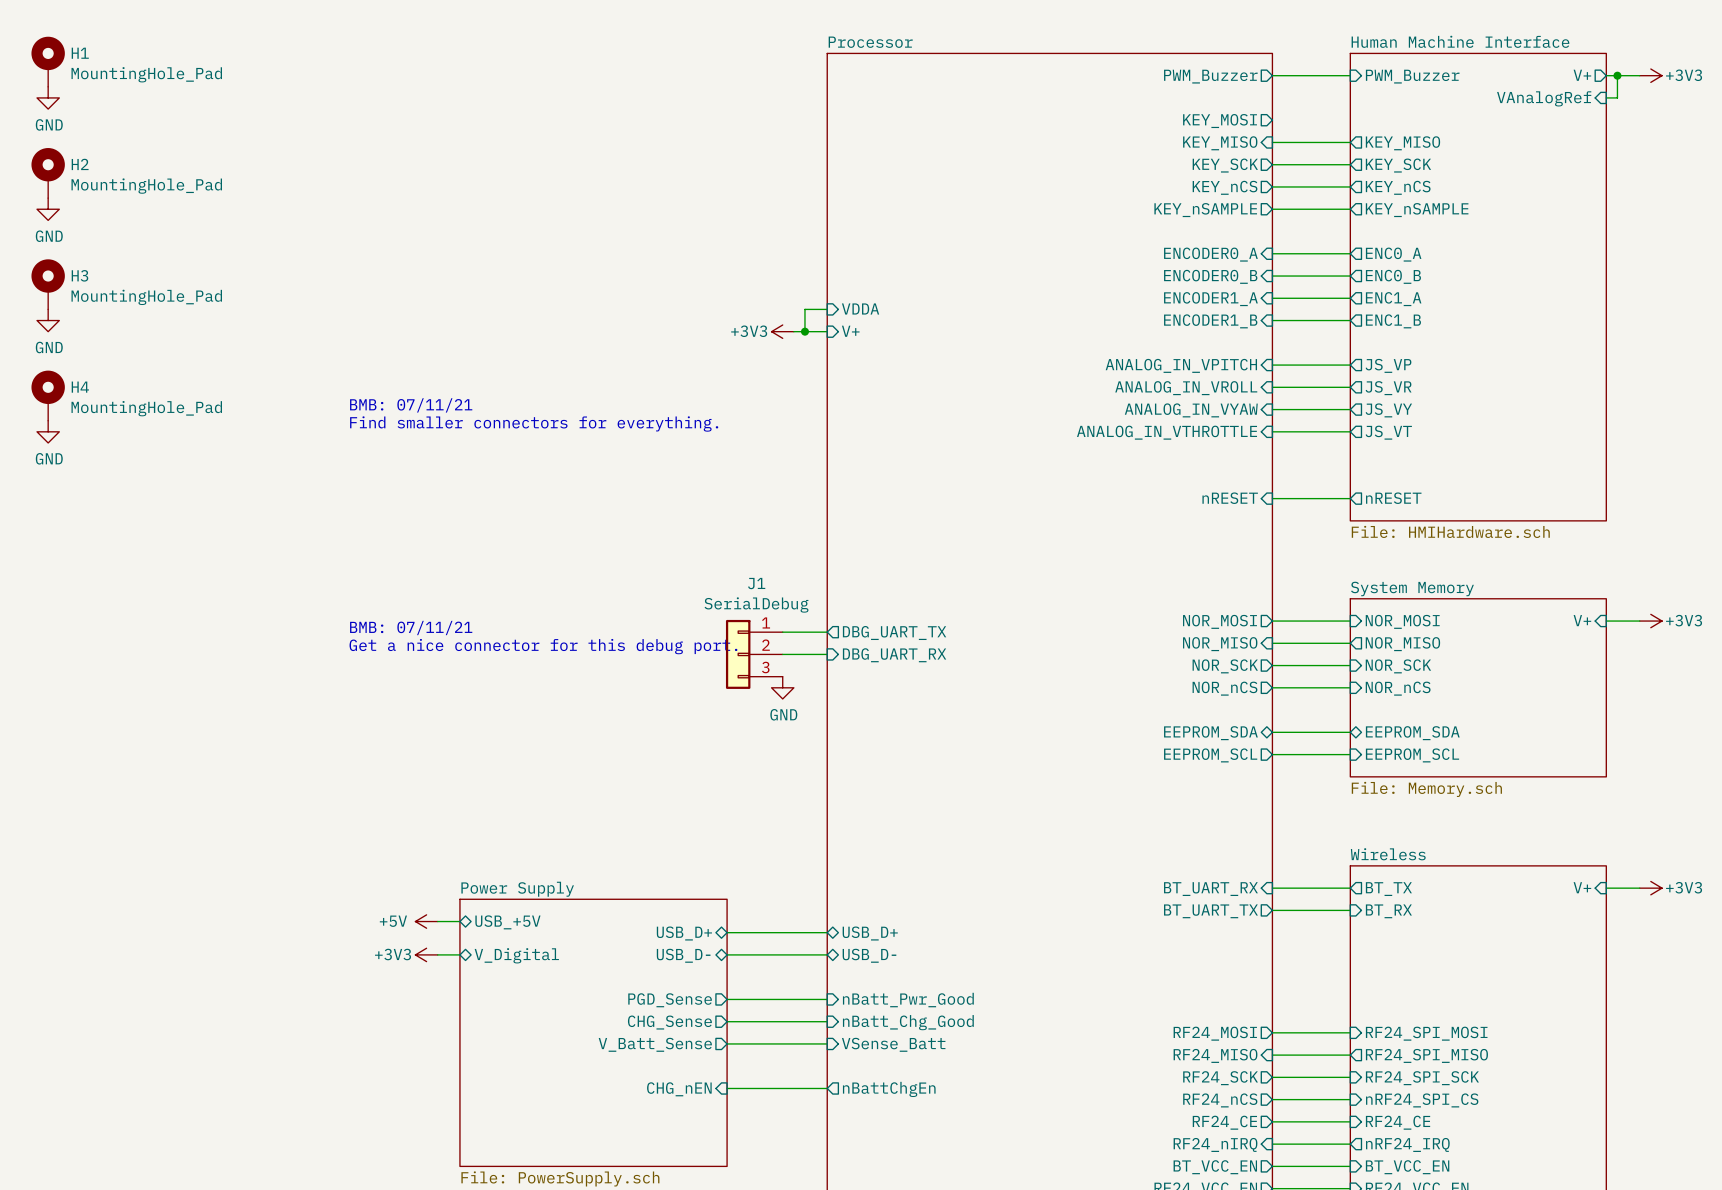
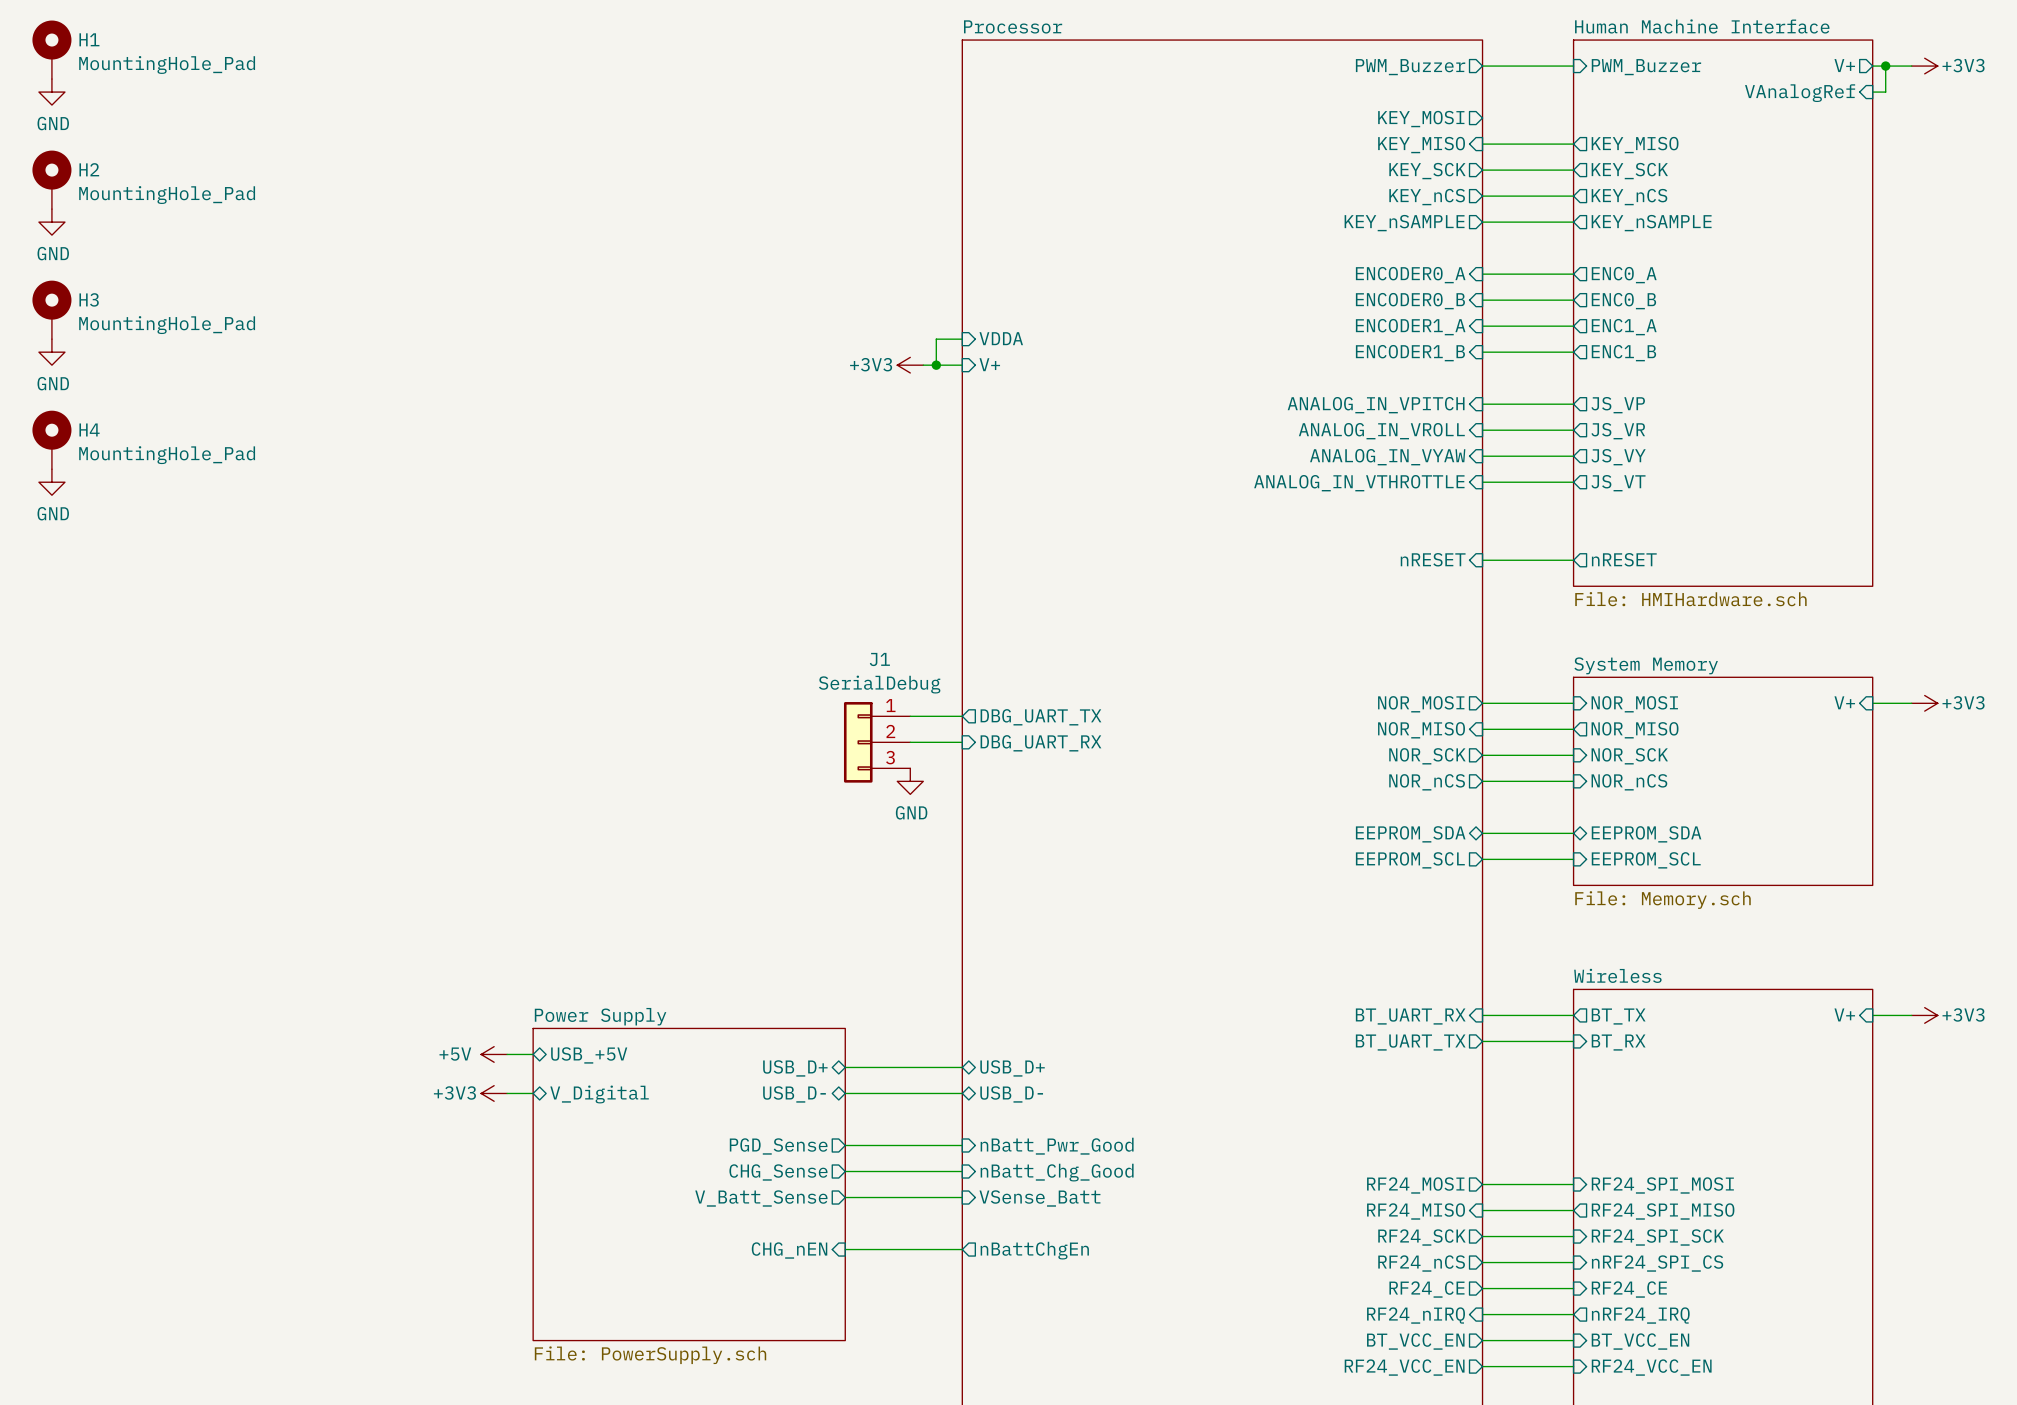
text: BMB: 07/11/21 (411, 405) -> none
text: Find smaller connectors for everything. (534, 424) -> none
text: BMB: 07/11/21 (411, 627) -> none
text: Get a nice connector for this debug port. (543, 646) -> none

